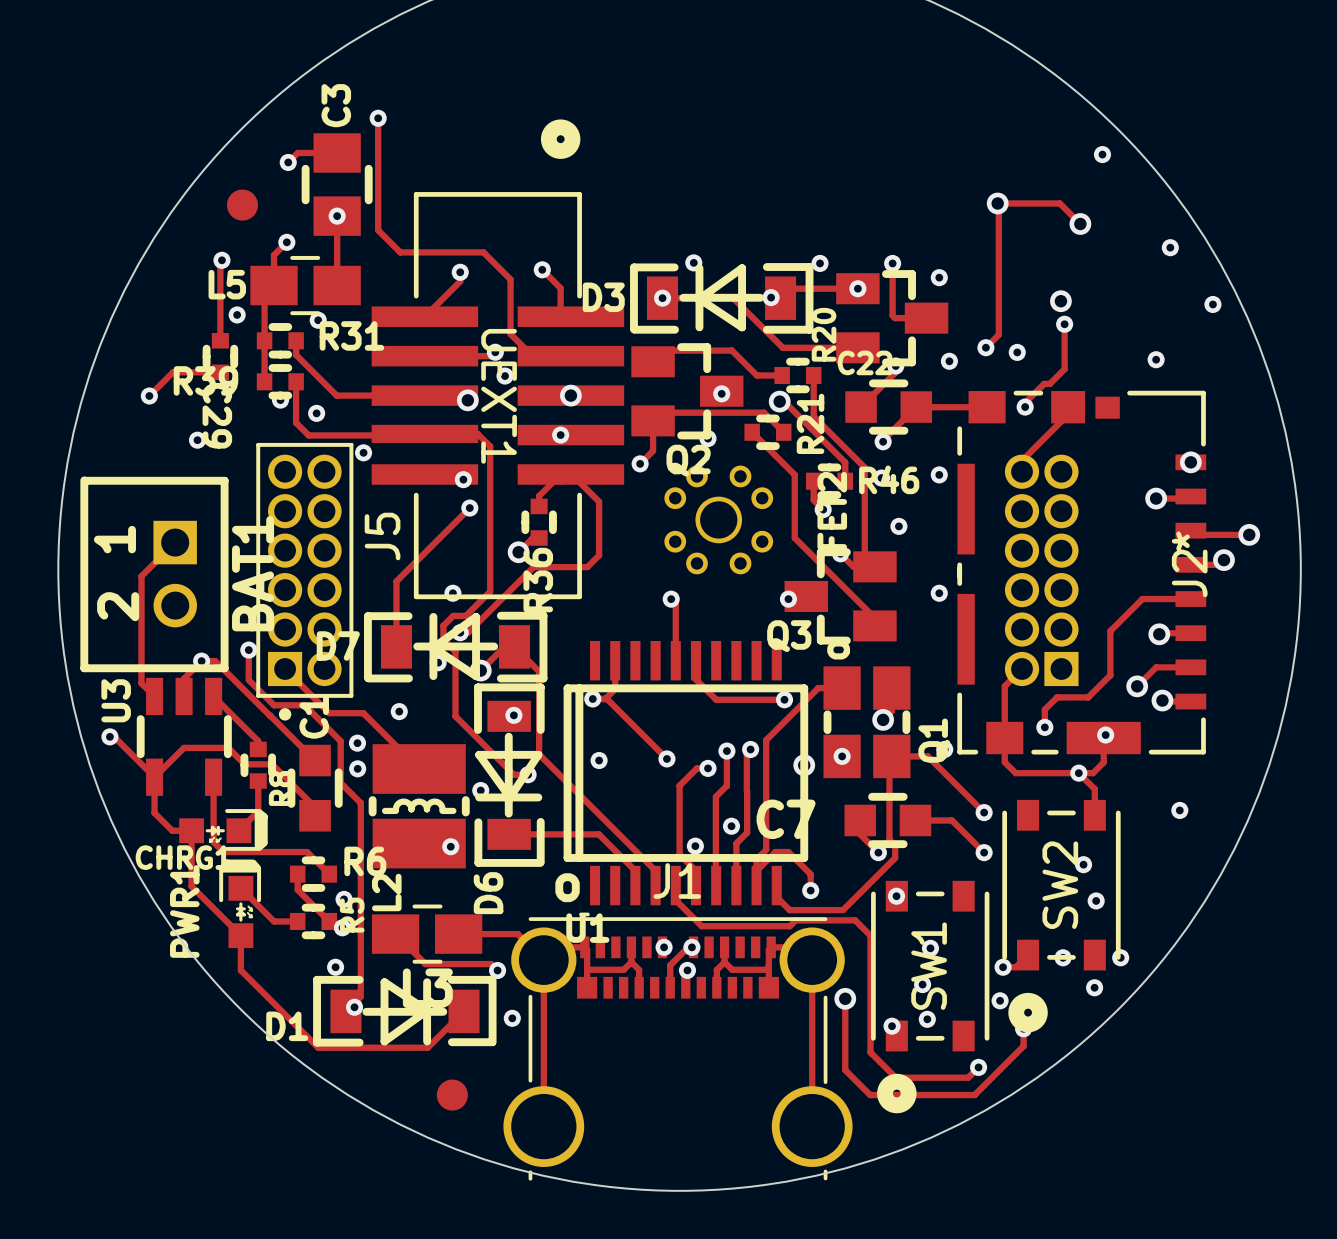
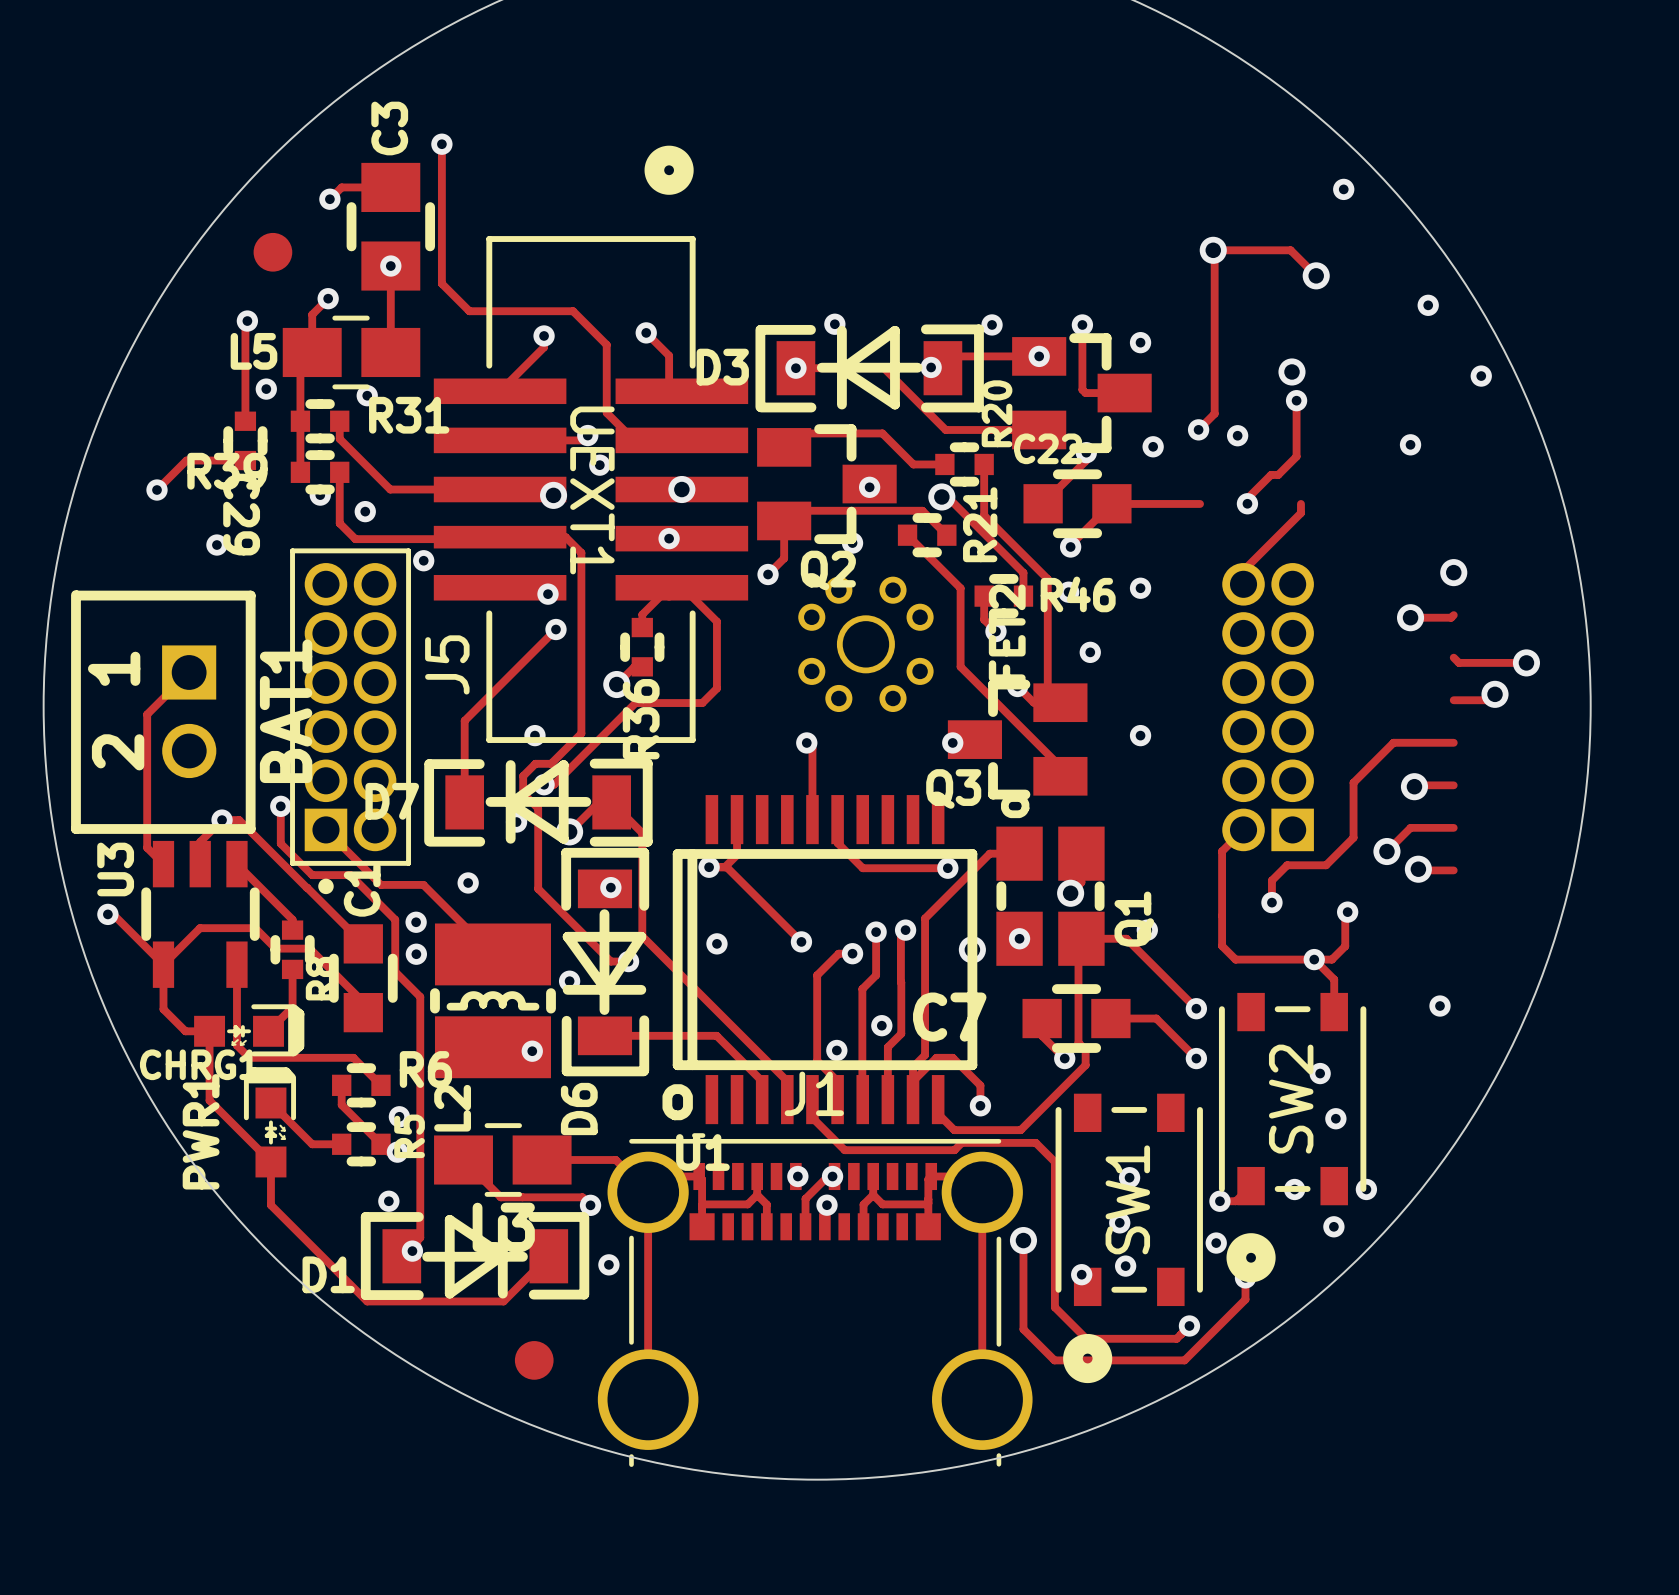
J2: (1081, 572) -> none
via: (896, 896) -> none

